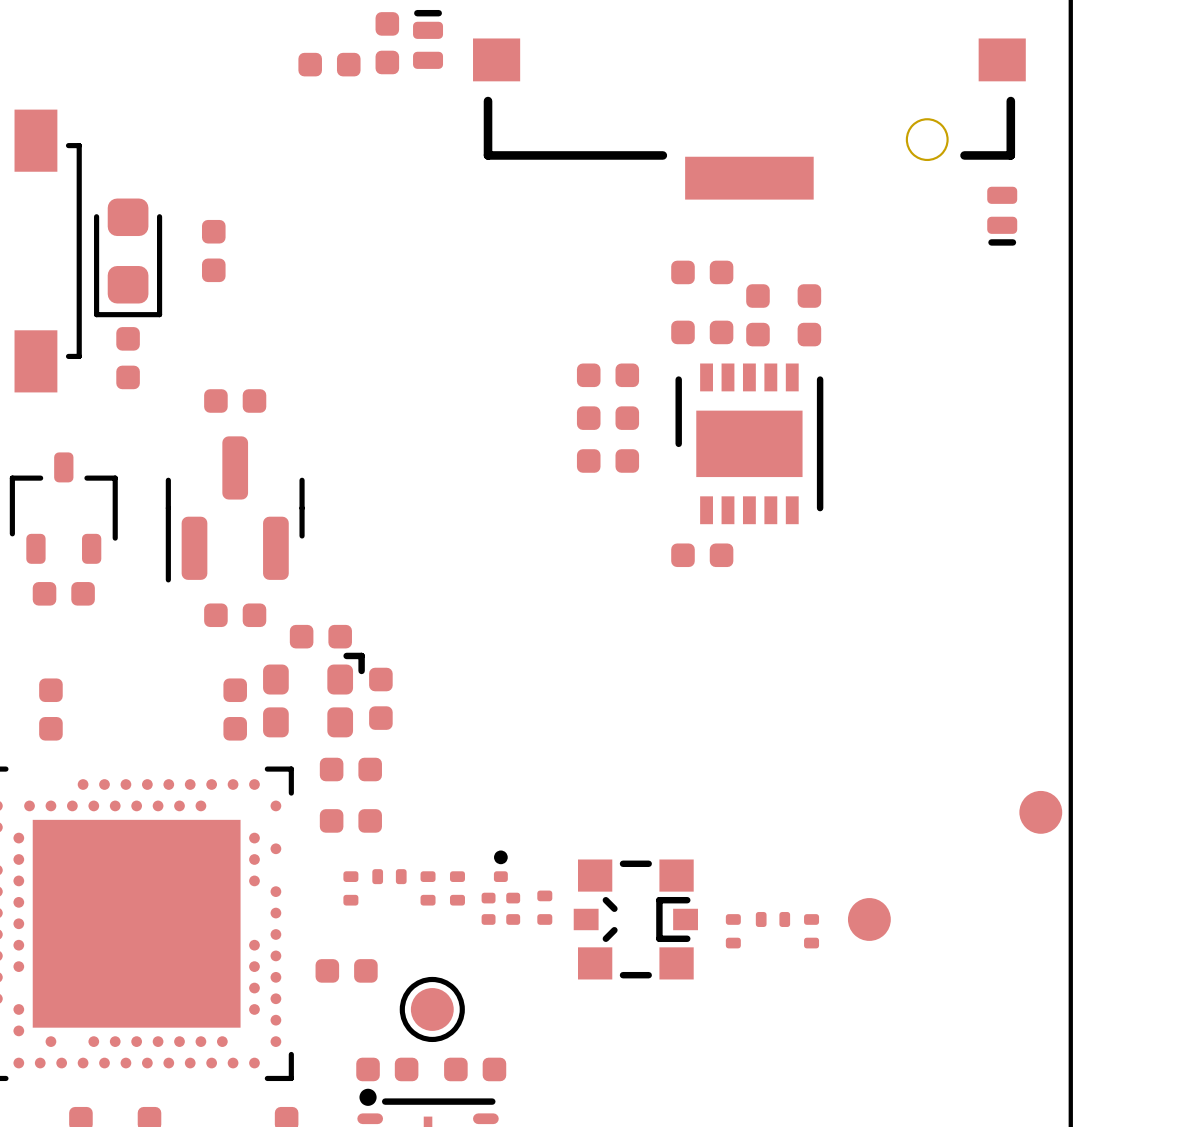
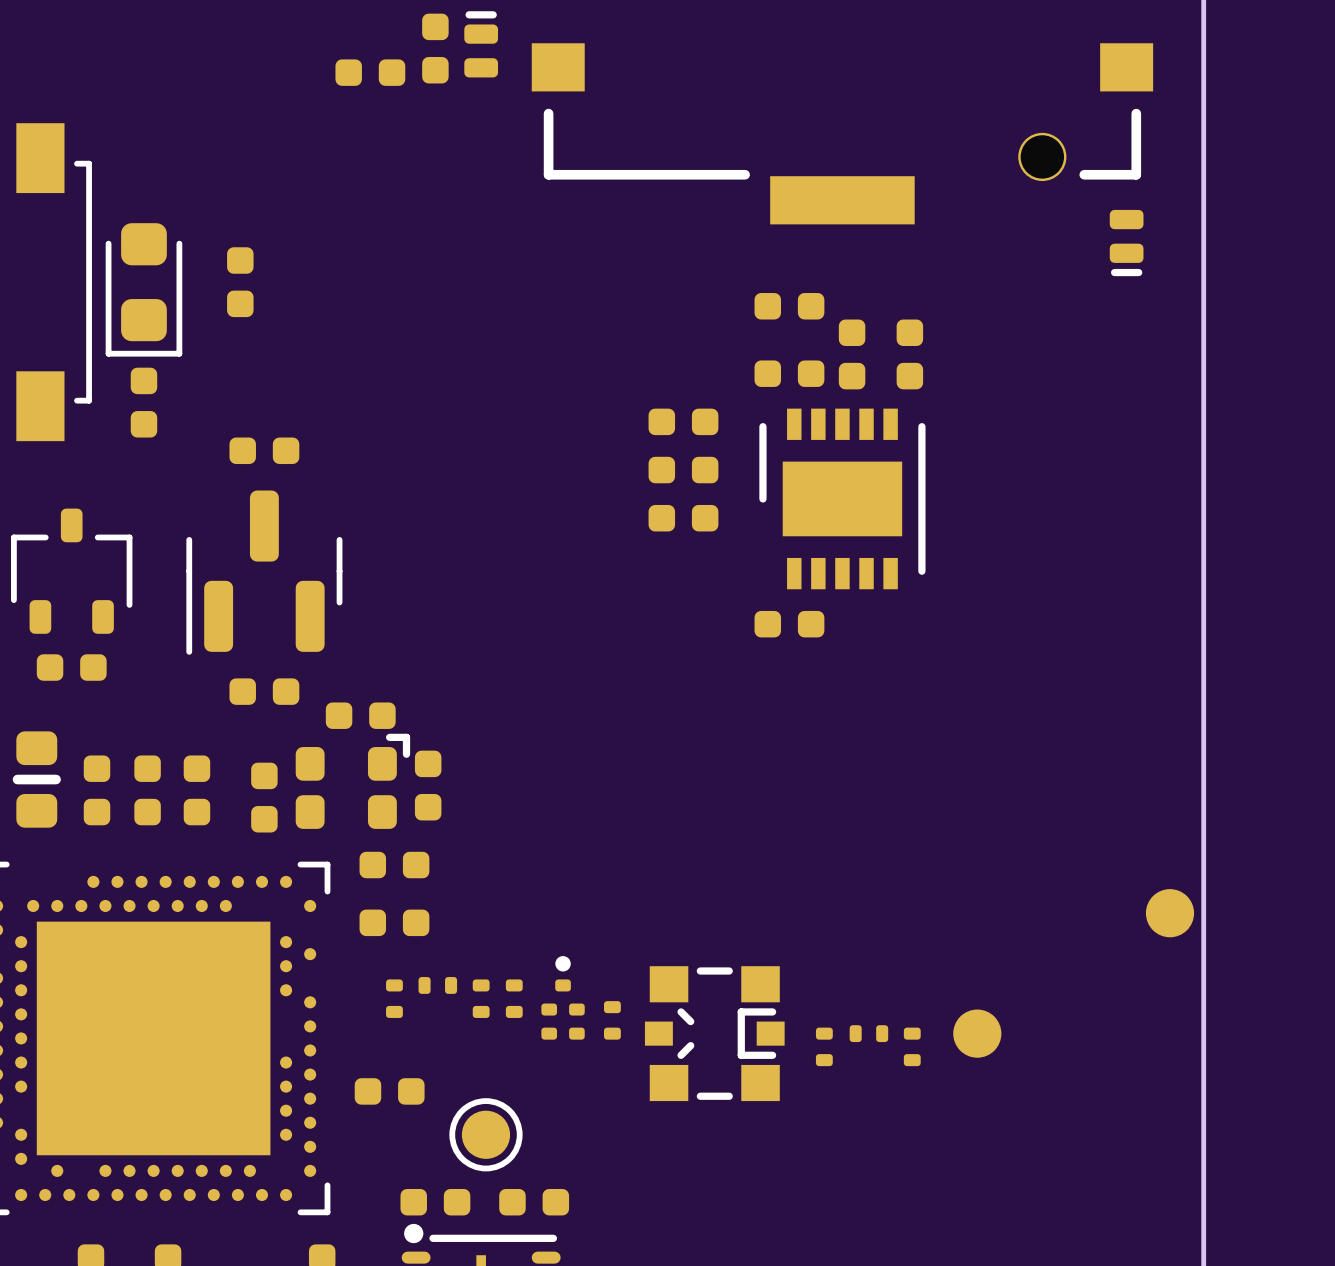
part: none -> (36, 779)
part: none -> (147, 790)
part: none -> (196, 790)
part position: (50, 709) -> (97, 790)

